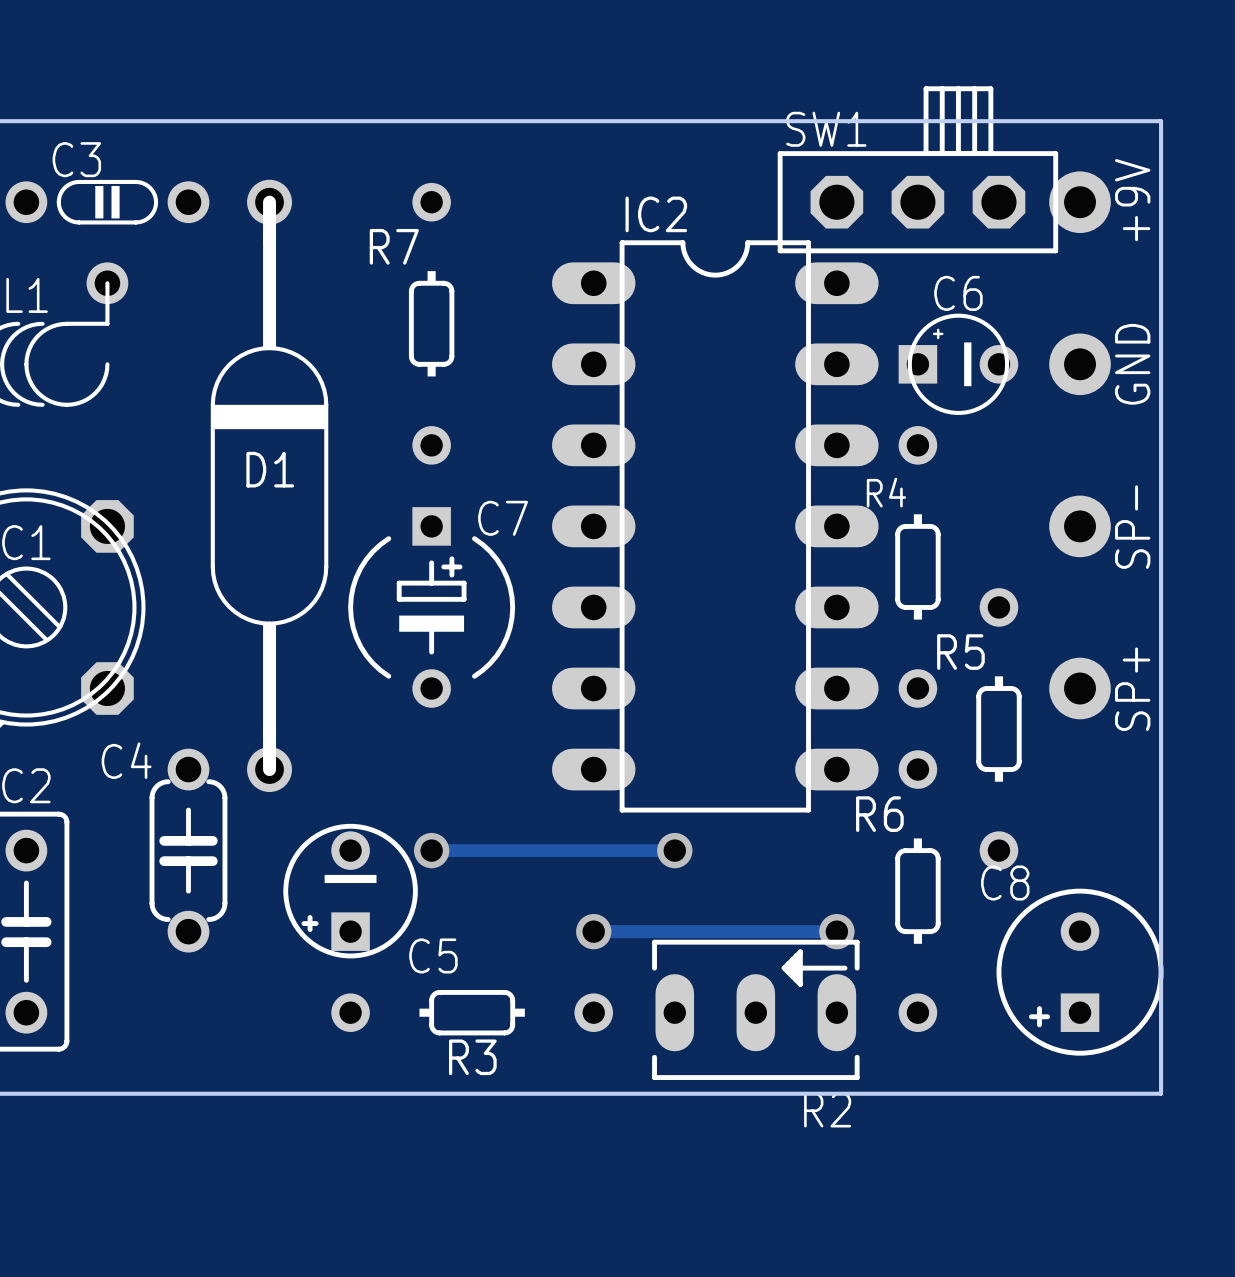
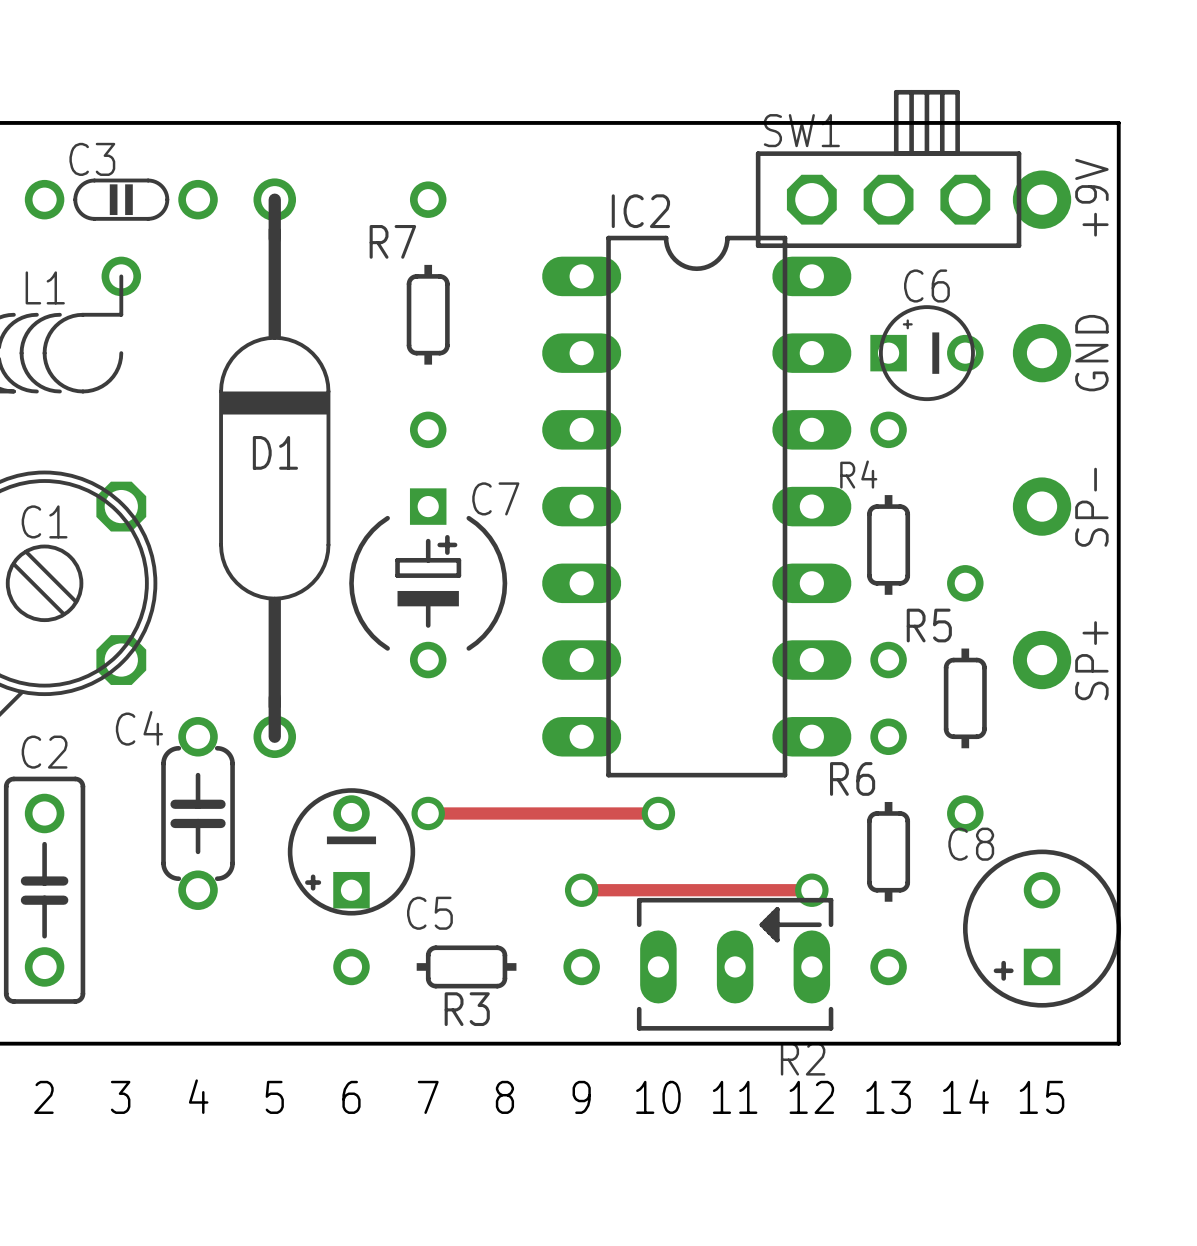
text: none -> 4 (198, 1096)
text: none -> 14 (965, 1096)
text: none -> 2 (43, 1097)
text: none -> 3 (120, 1097)
text: none -> 5 (274, 1097)
text: none -> 6 (351, 1097)
text: none -> 7 (428, 1097)
text: none -> 8 (504, 1097)
text: none -> 9 (581, 1097)
text: none -> 10 (658, 1097)
text: none -> 11 (735, 1097)
text: none -> 12 (811, 1097)
text: none -> 13 (888, 1097)
text: none -> 15 (1042, 1097)

